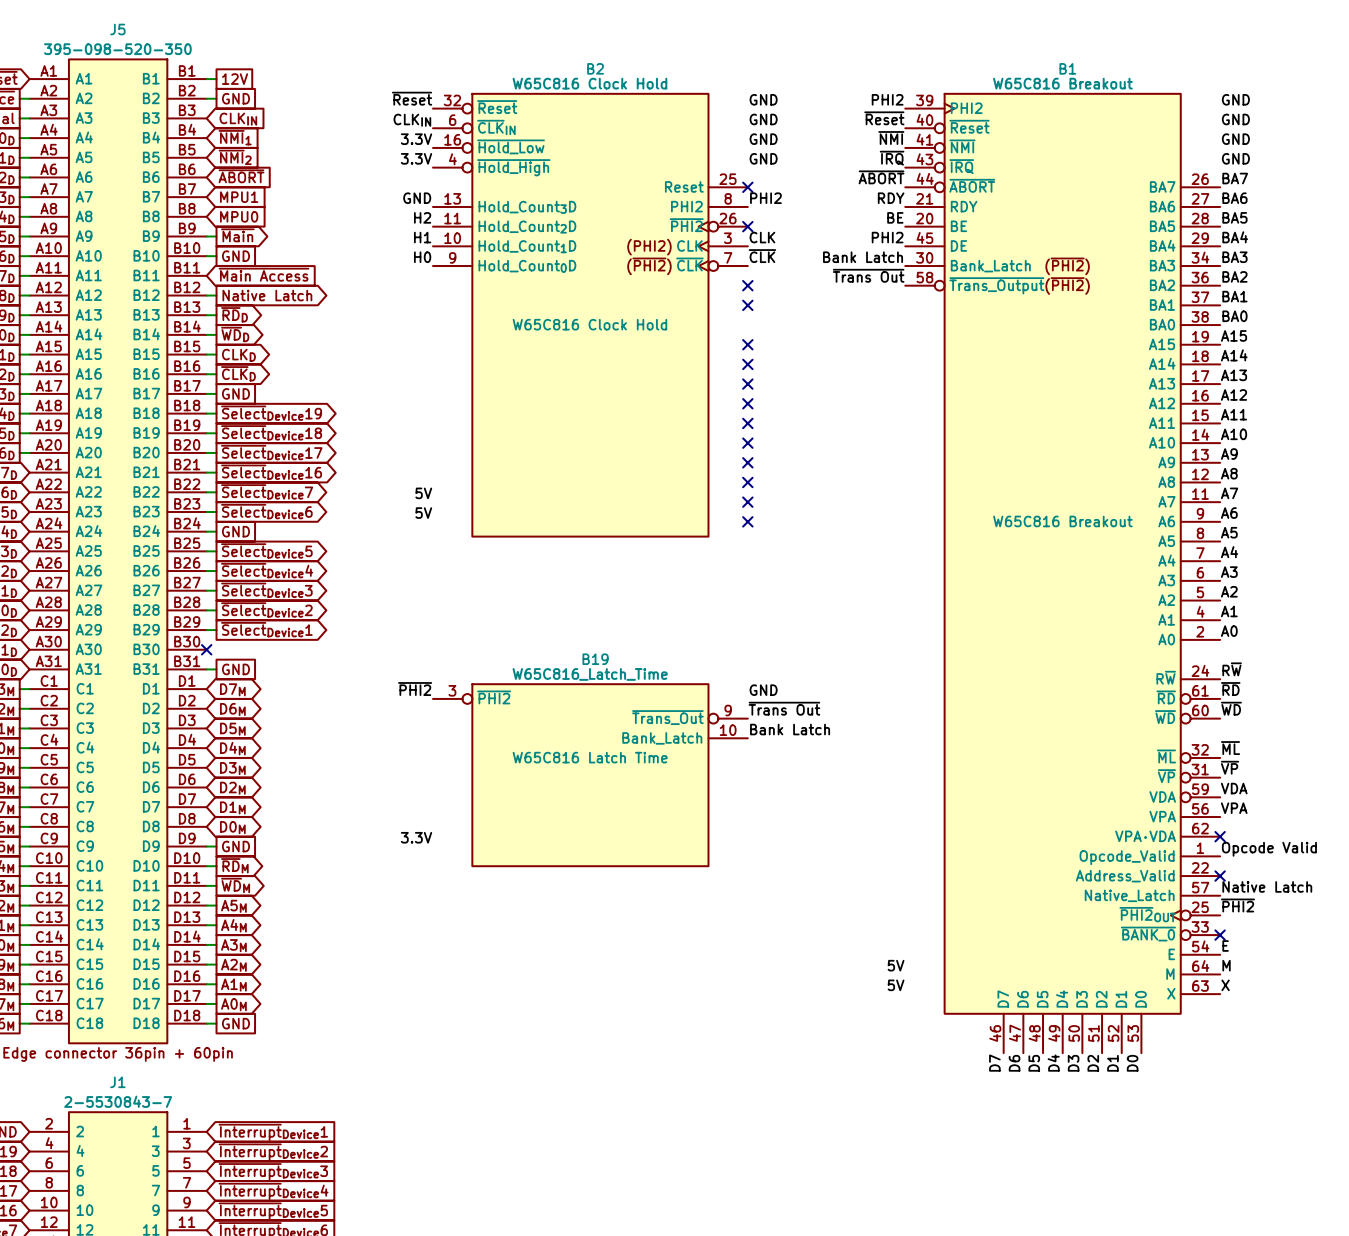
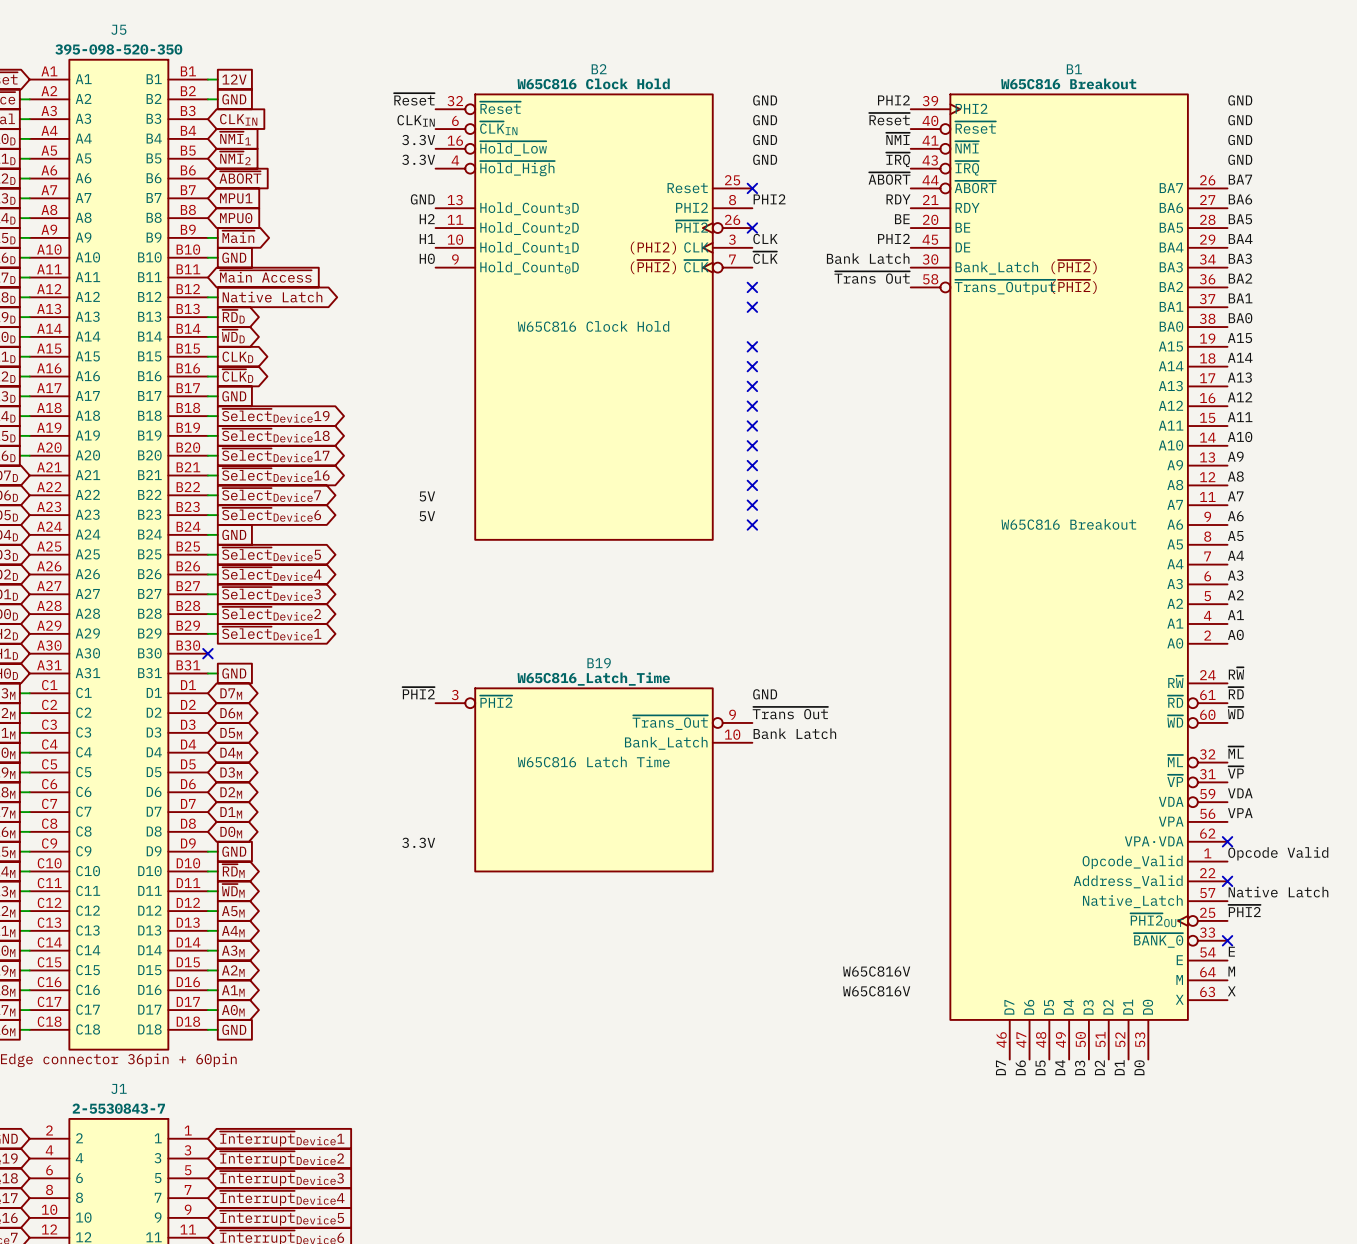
label: 5V (896, 965) -> W65C816V (876, 971)
label: 5V (896, 985) -> W65C816V (876, 991)

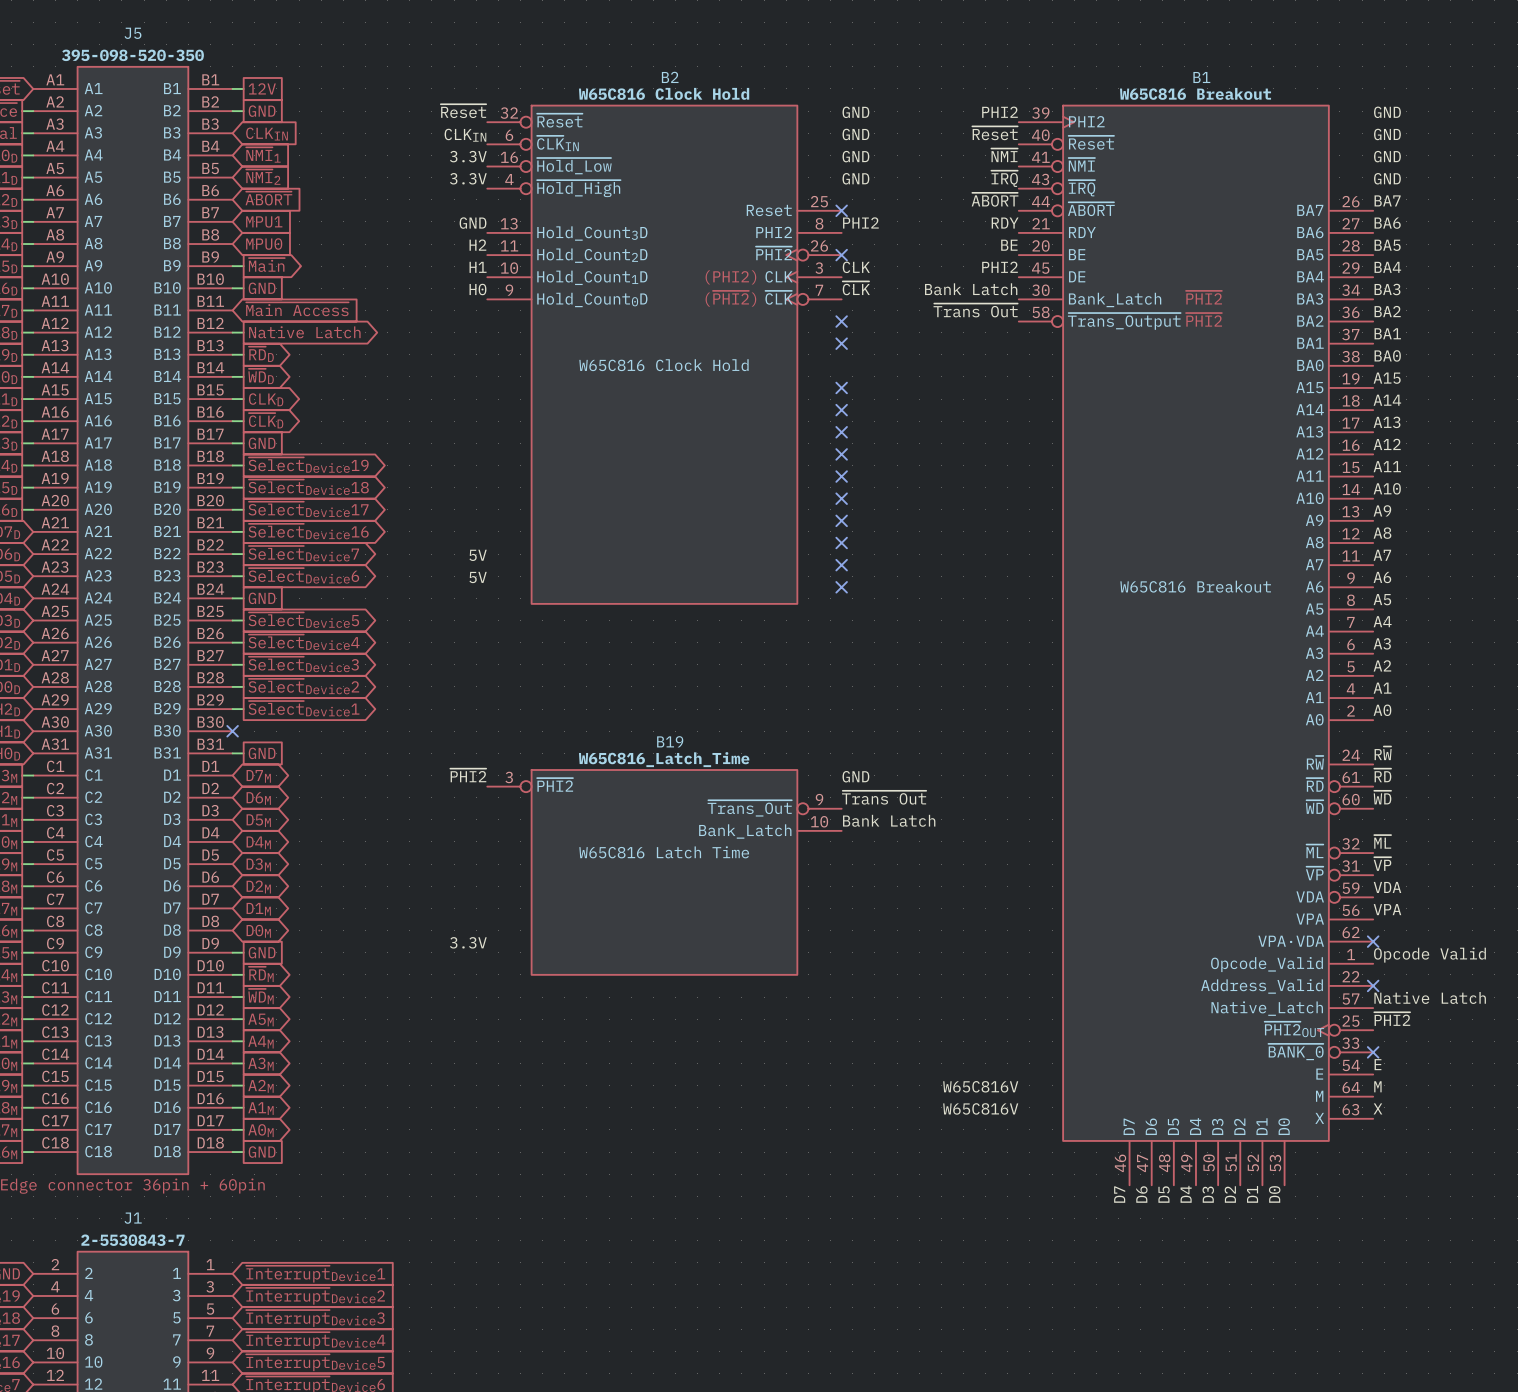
B1 text: none -> ~{PHI2} (1204, 297)
B1 text: (~{PHI2}) (1074, 267) -> none
B1 text: none -> ~{PHI2} (1204, 319)
B1 text: (~{PHI2}) (1074, 286) -> none

